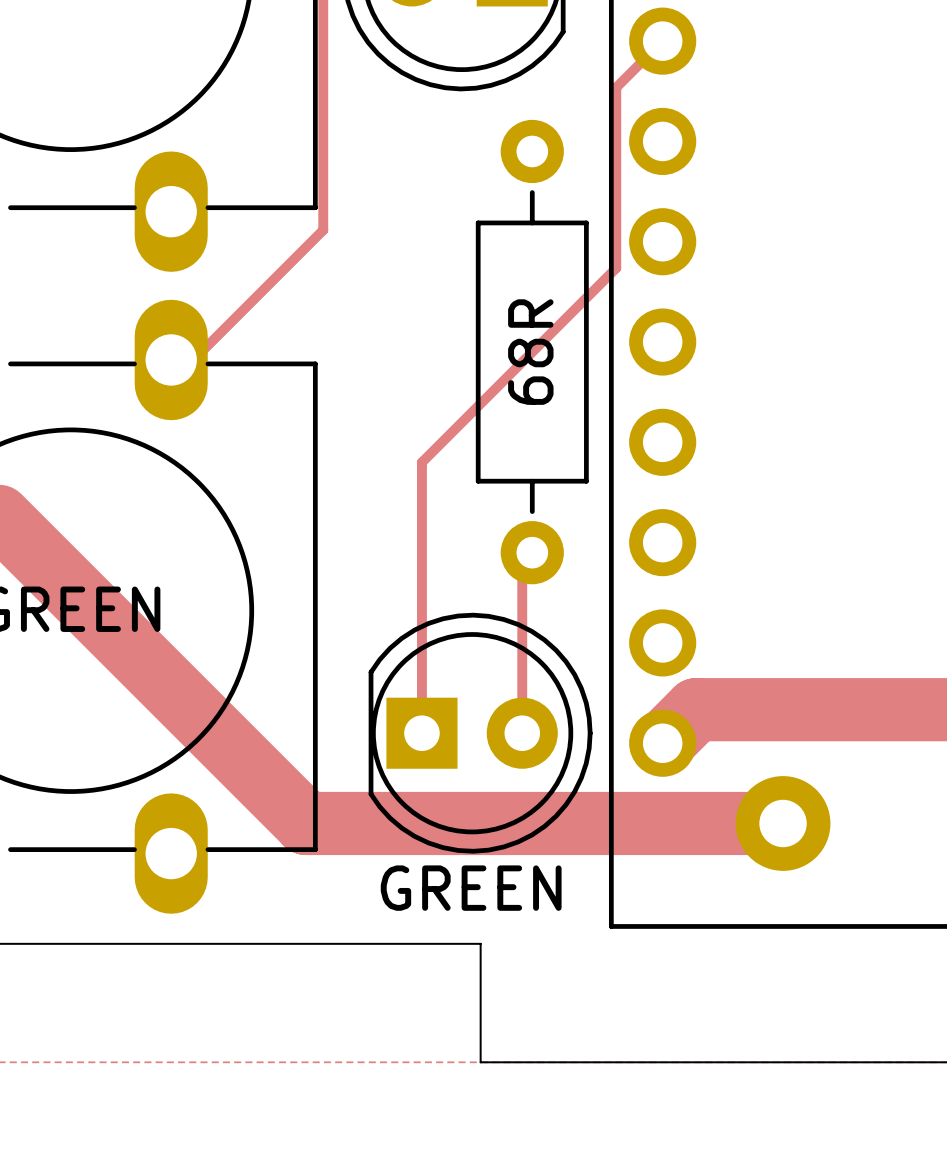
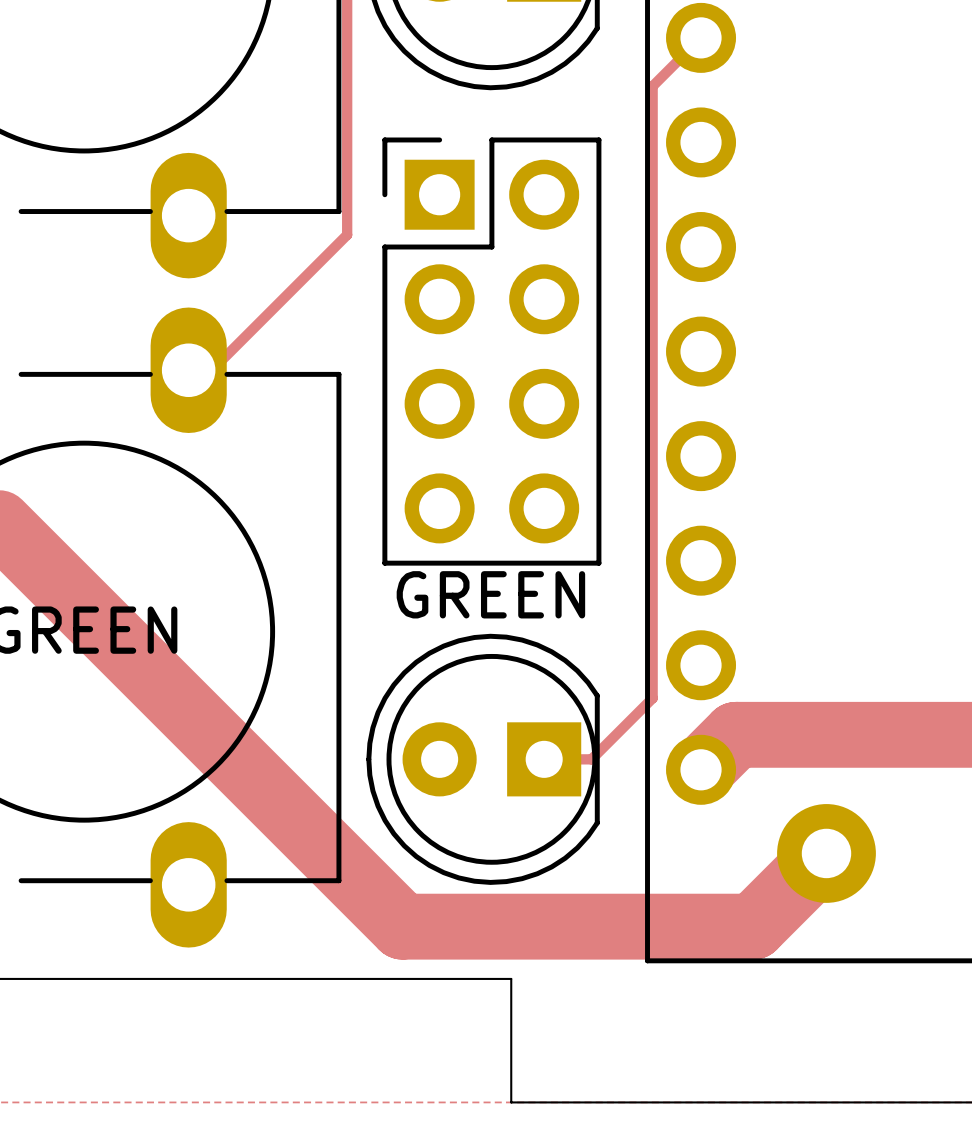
track: (616, 268) (421, 462) (421, 733) -> (652, 274) (652, 698) (591, 759) (544, 759)
part: none -> (491, 351)
part: 68R (532, 352) -> none
track: (532, 552) (522, 562) (522, 733) -> none
part rotation: 0° (480, 733) -> 180° (483, 759)
track: (306, 823) (783, 823) -> (329, 853) (402, 926) (753, 926) (816, 863) (816, 843) (826, 853)

